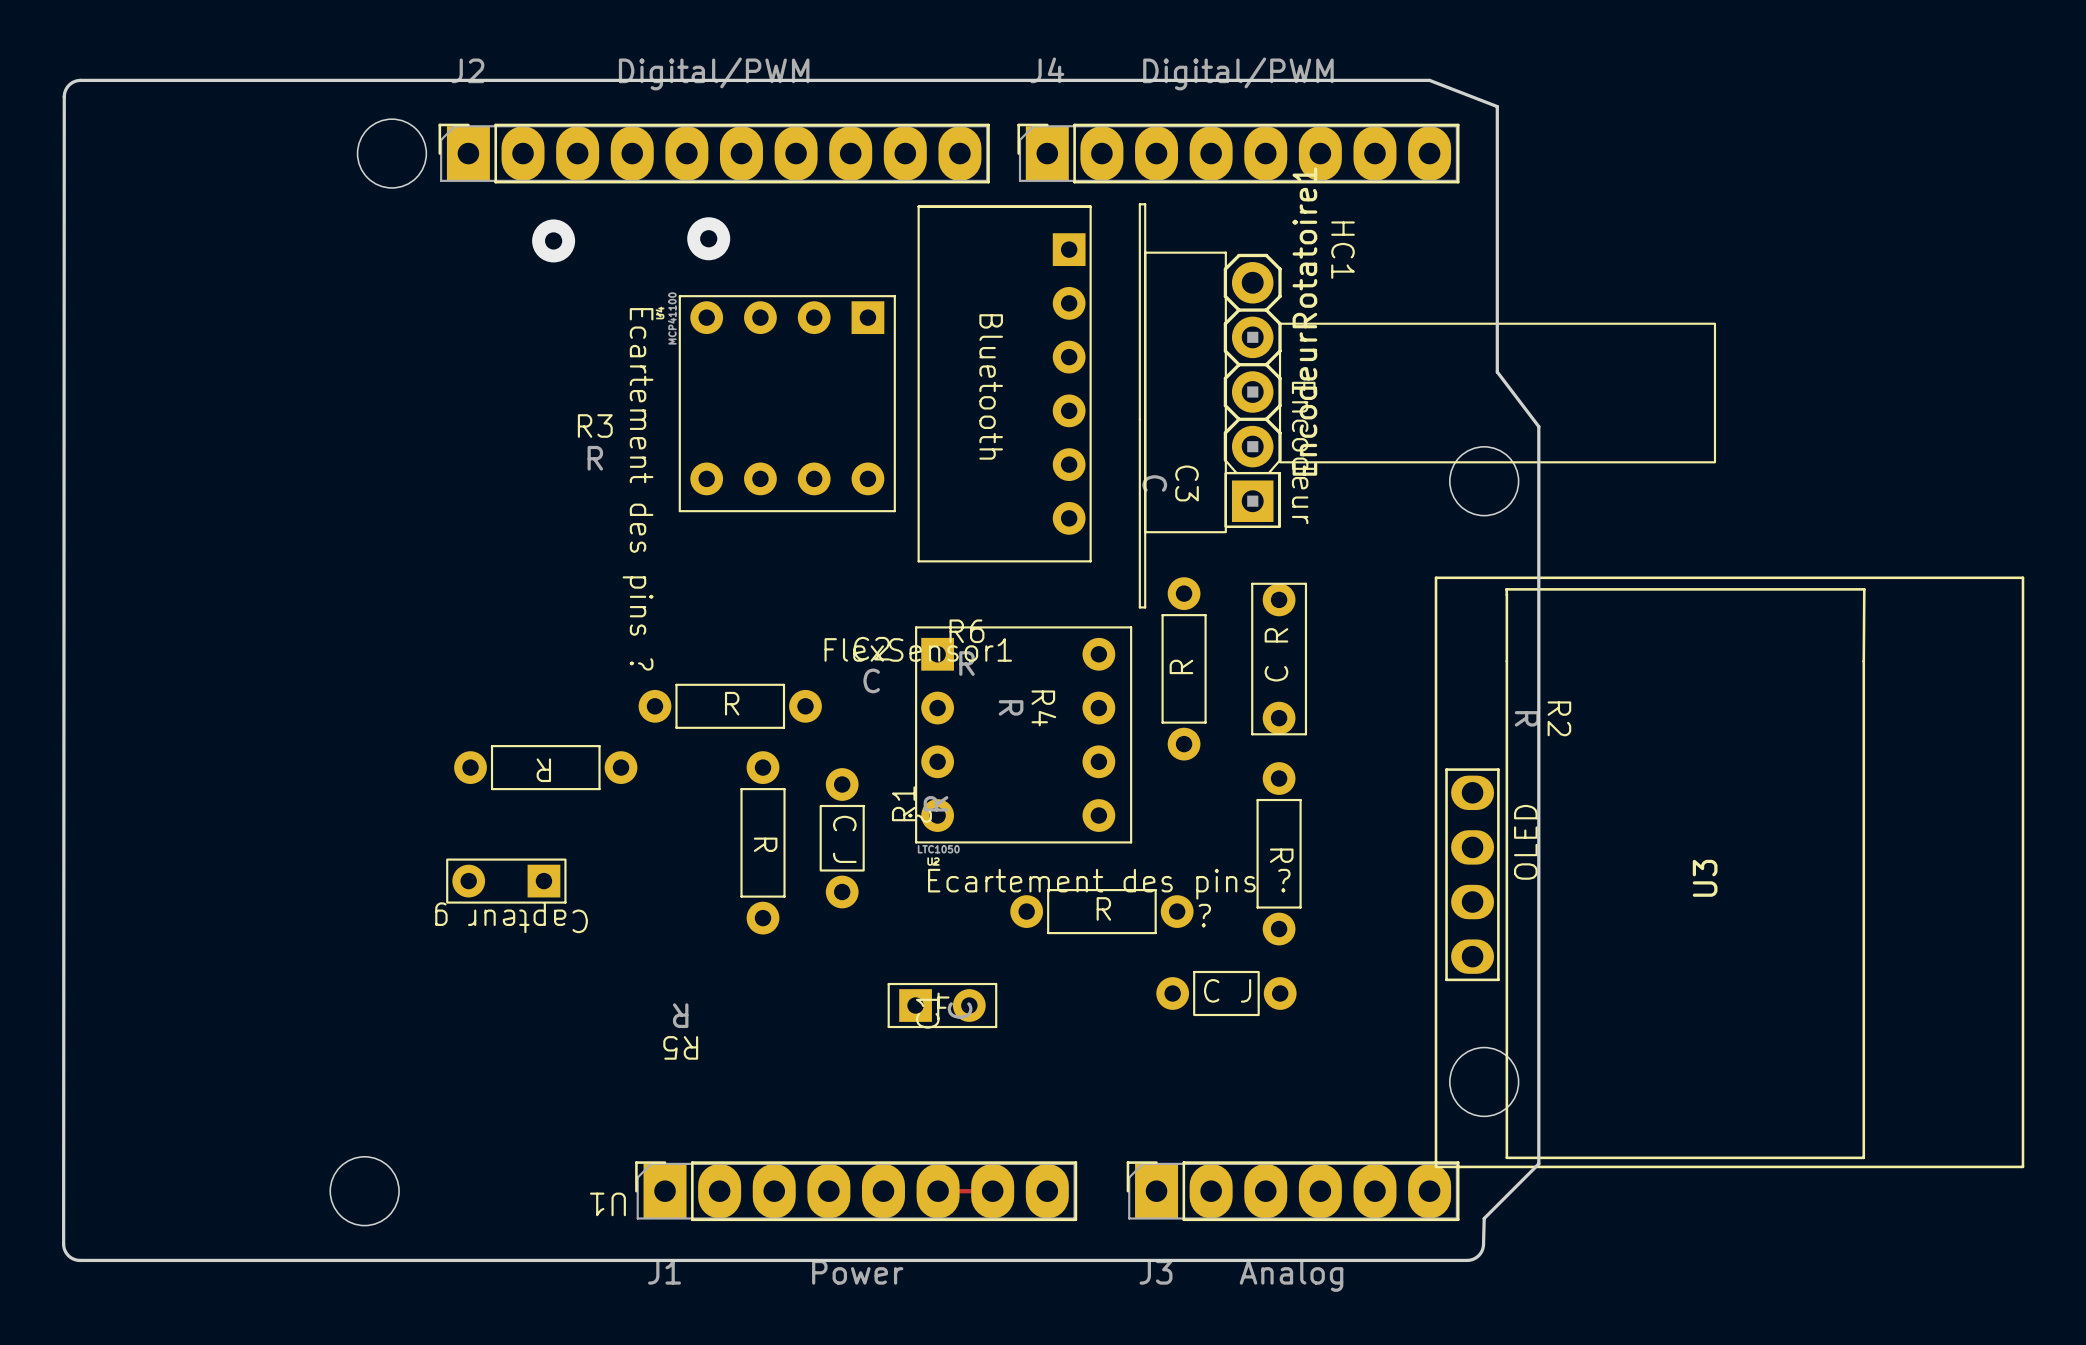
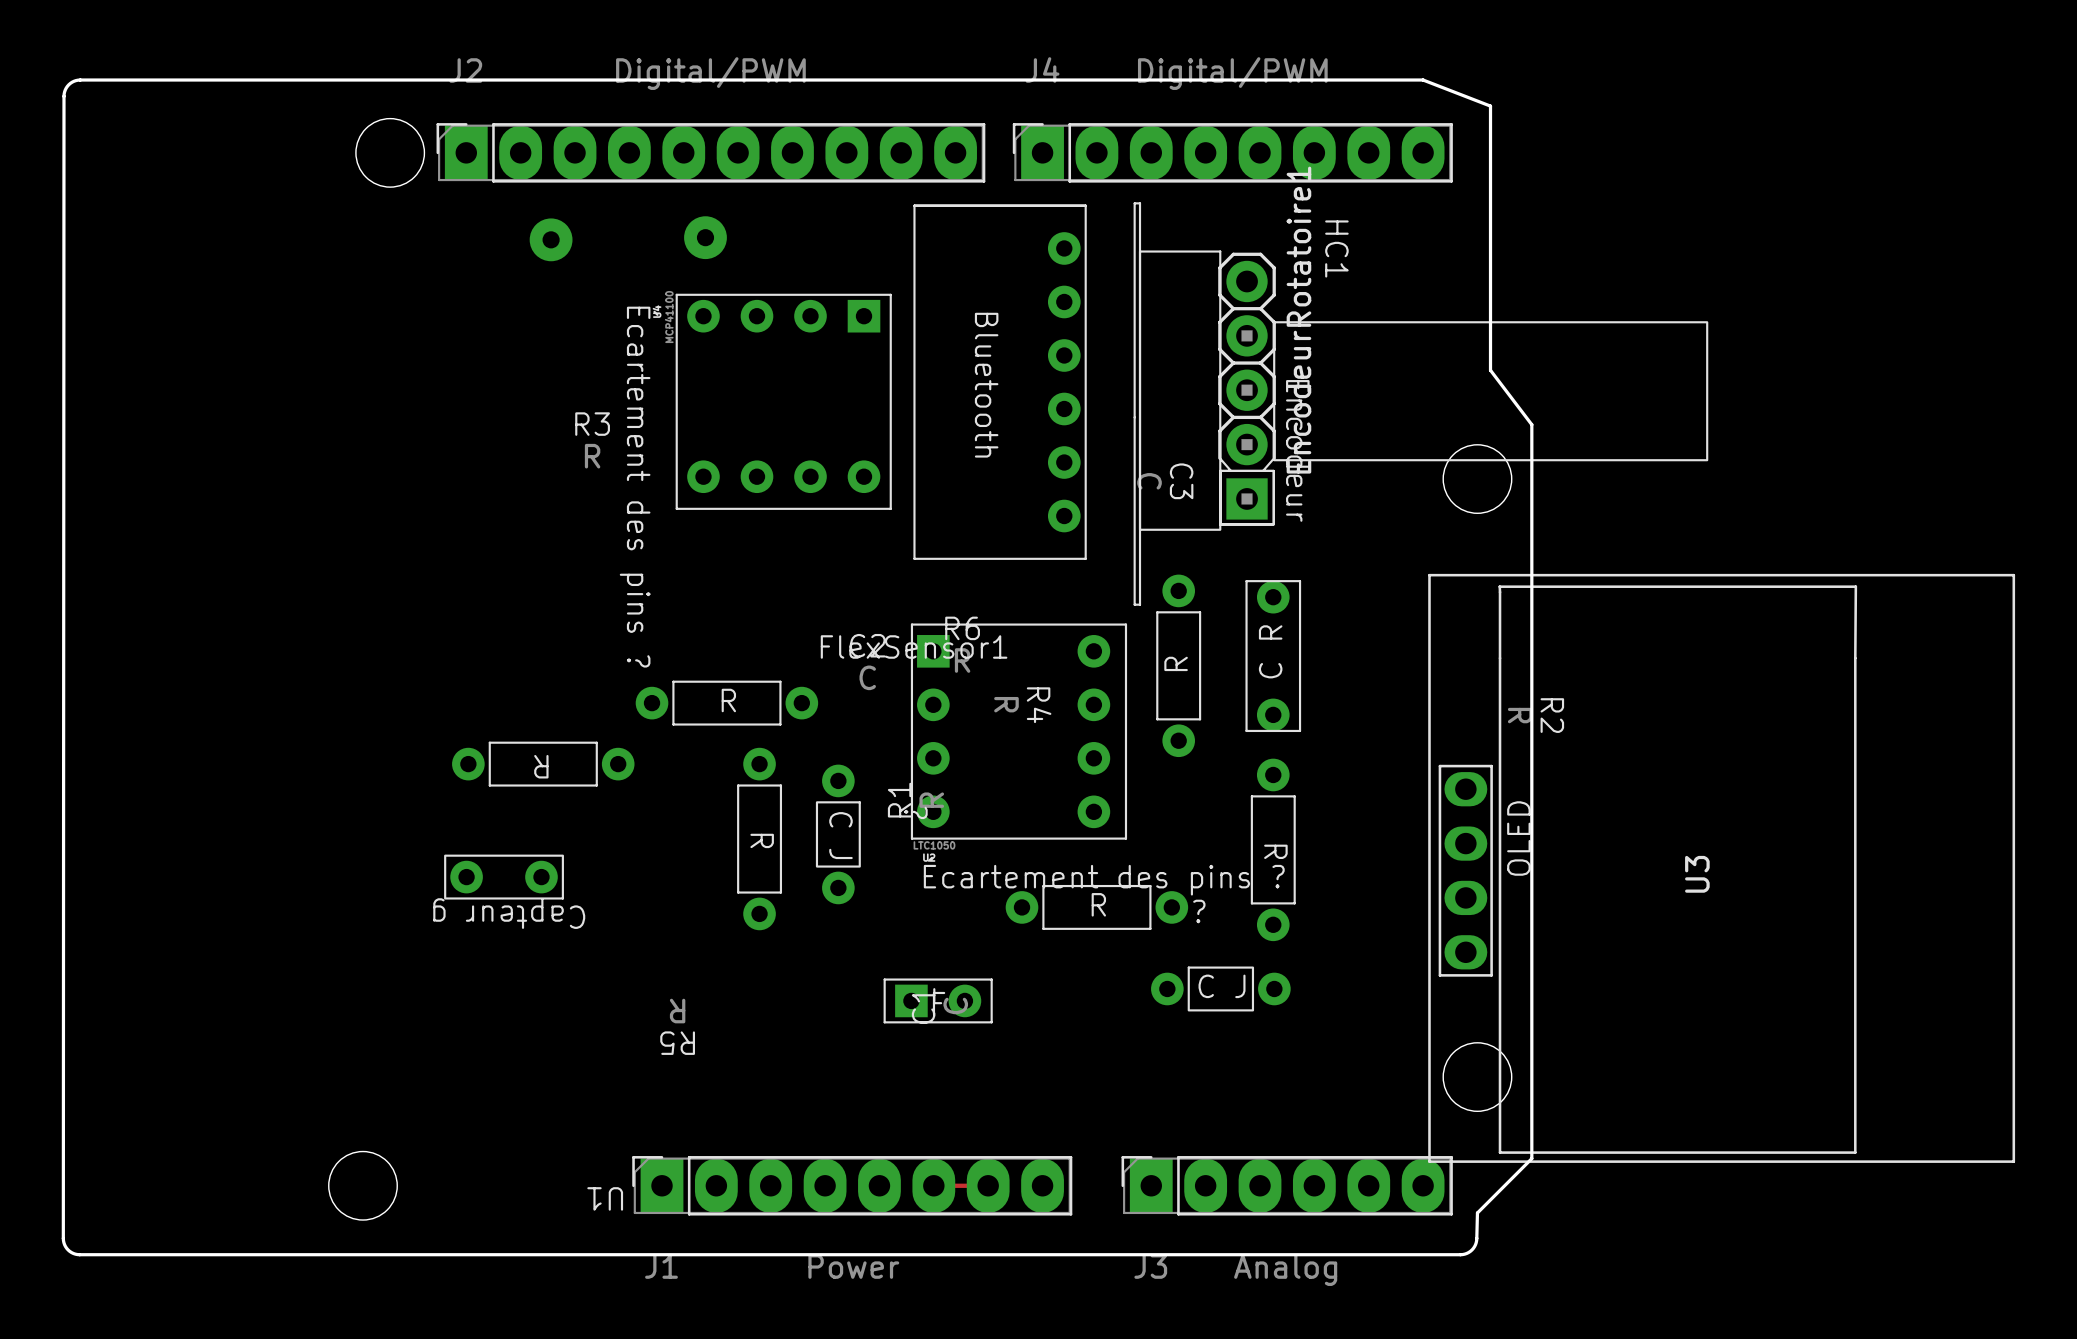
HC1 footprint: [917, 205, 1092, 563] -> [913, 204, 1087, 560]
U1 footprint: [446, 858, 567, 904] -> [444, 854, 564, 900]

